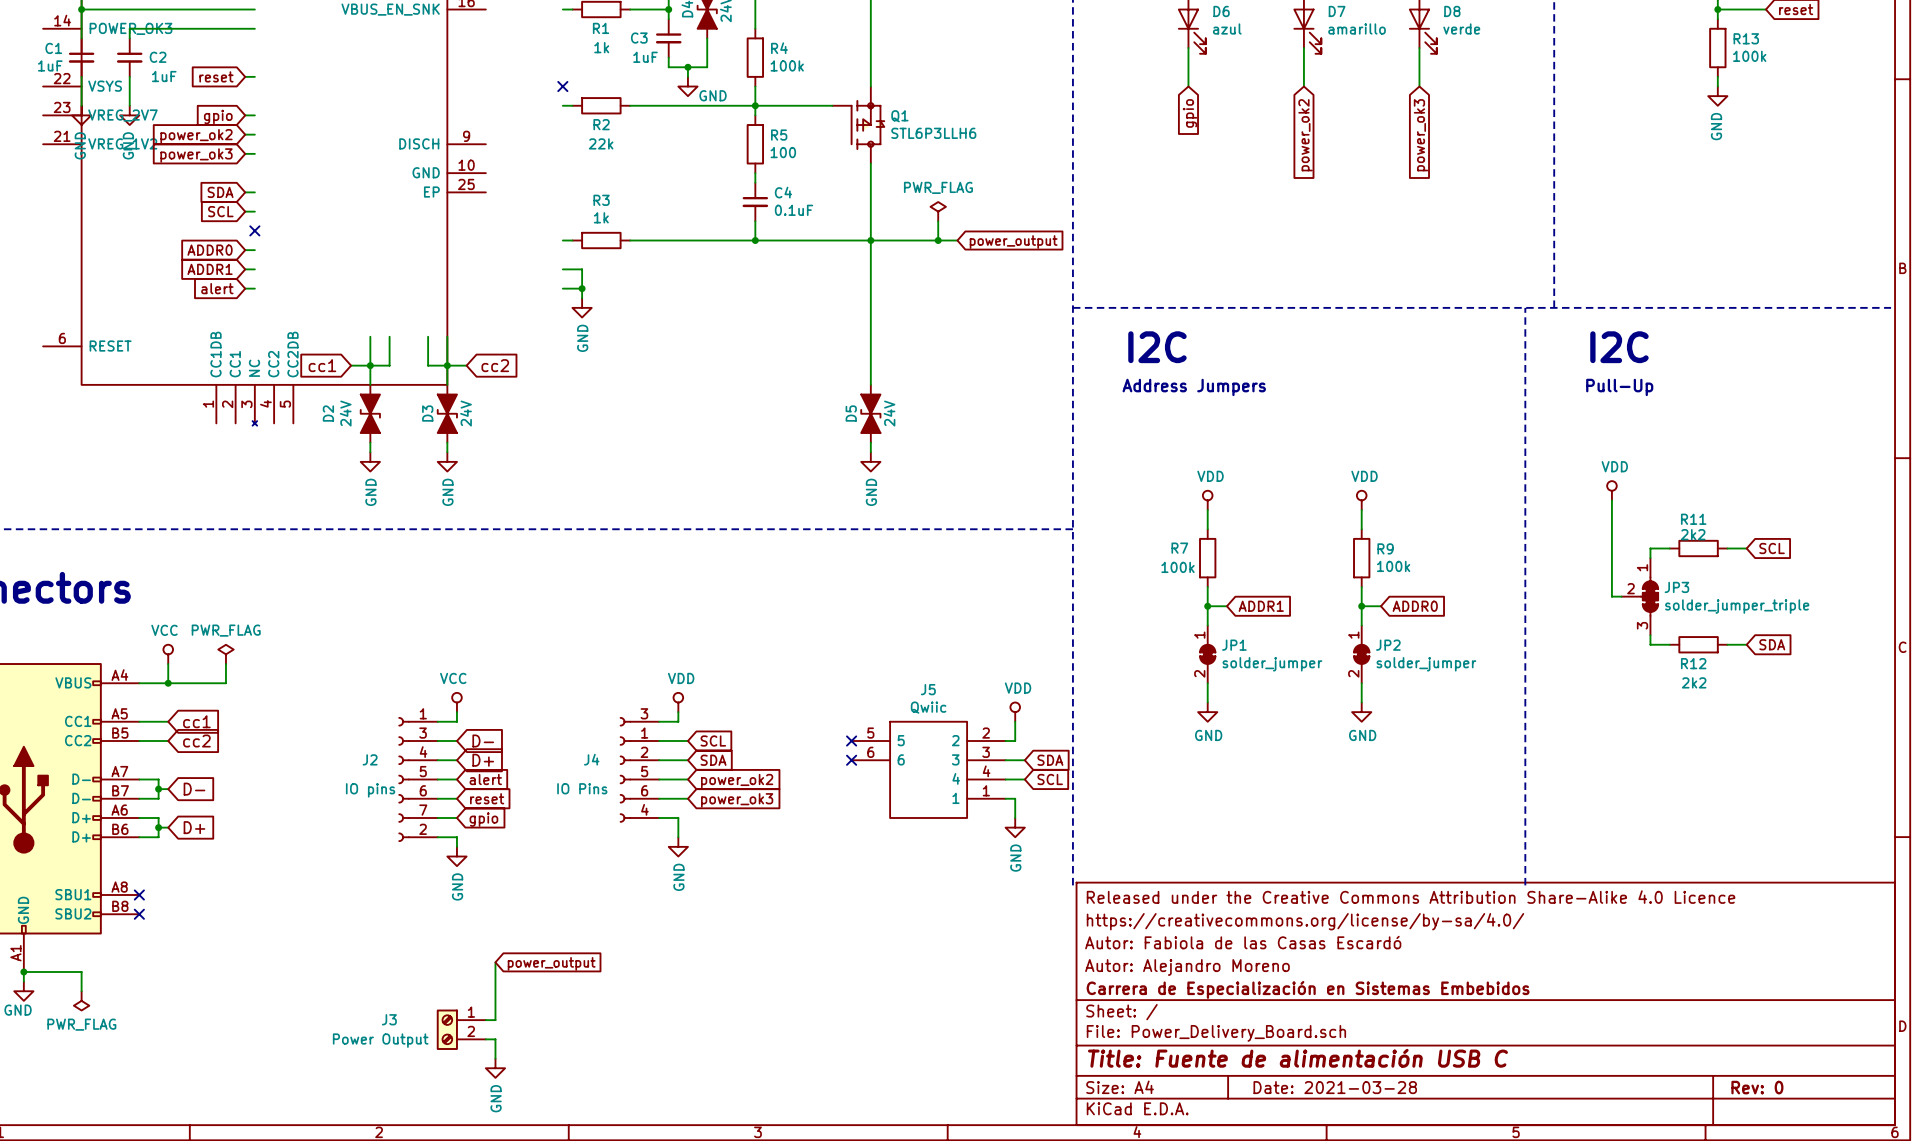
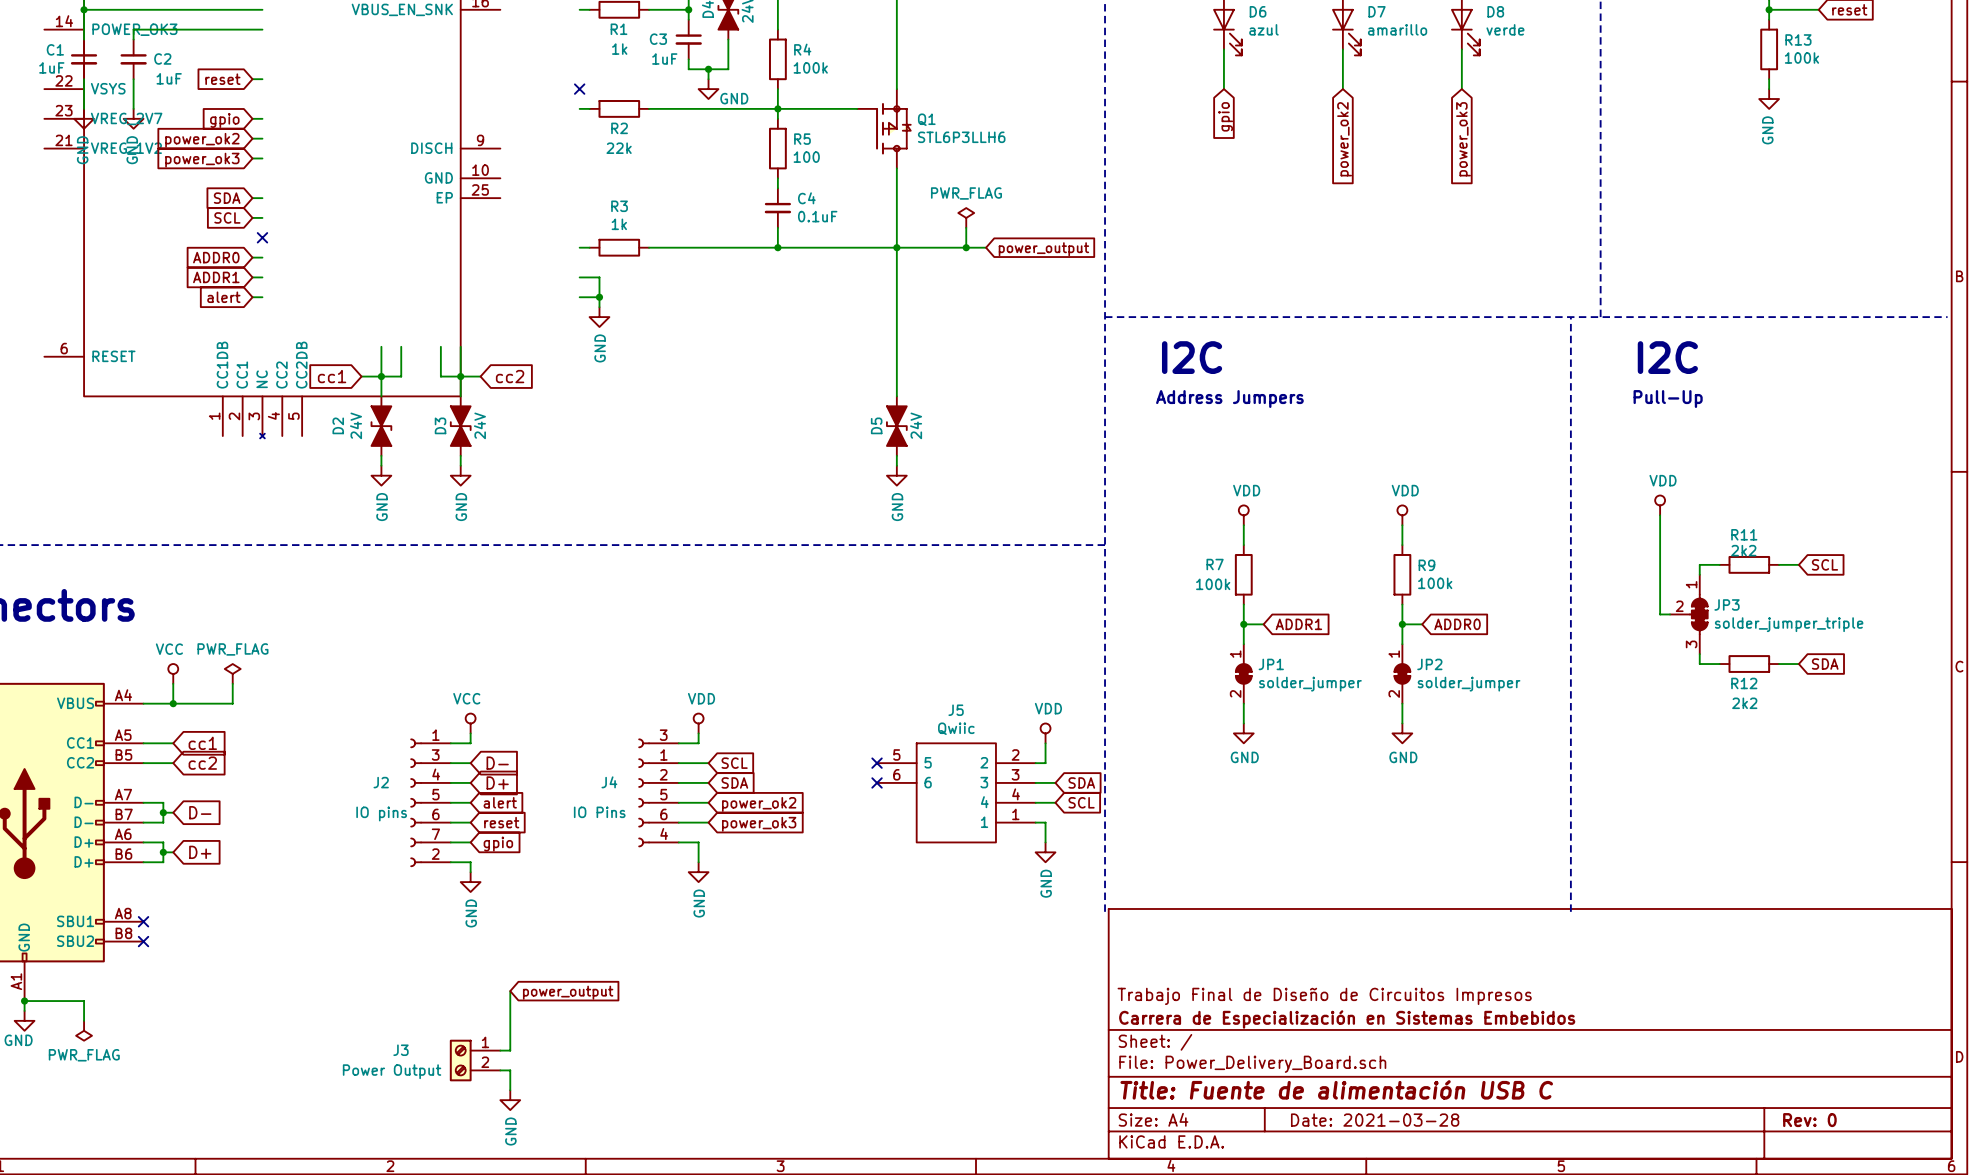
title block: Released under the Creative Commons Attribution Share-Alike 4.0 Licence (1411, 897) -> none
title block: https://creativecommons.org/license/by-sa/4.0/ (1305, 921) -> none
title block: Autor: Fabiola de las Casas Escardó (1243, 942) -> none
title block: Autor: Alejandro Moreno (1187, 967) -> Trabajo Final de Diseño de Circuitos Impresos (1324, 996)

